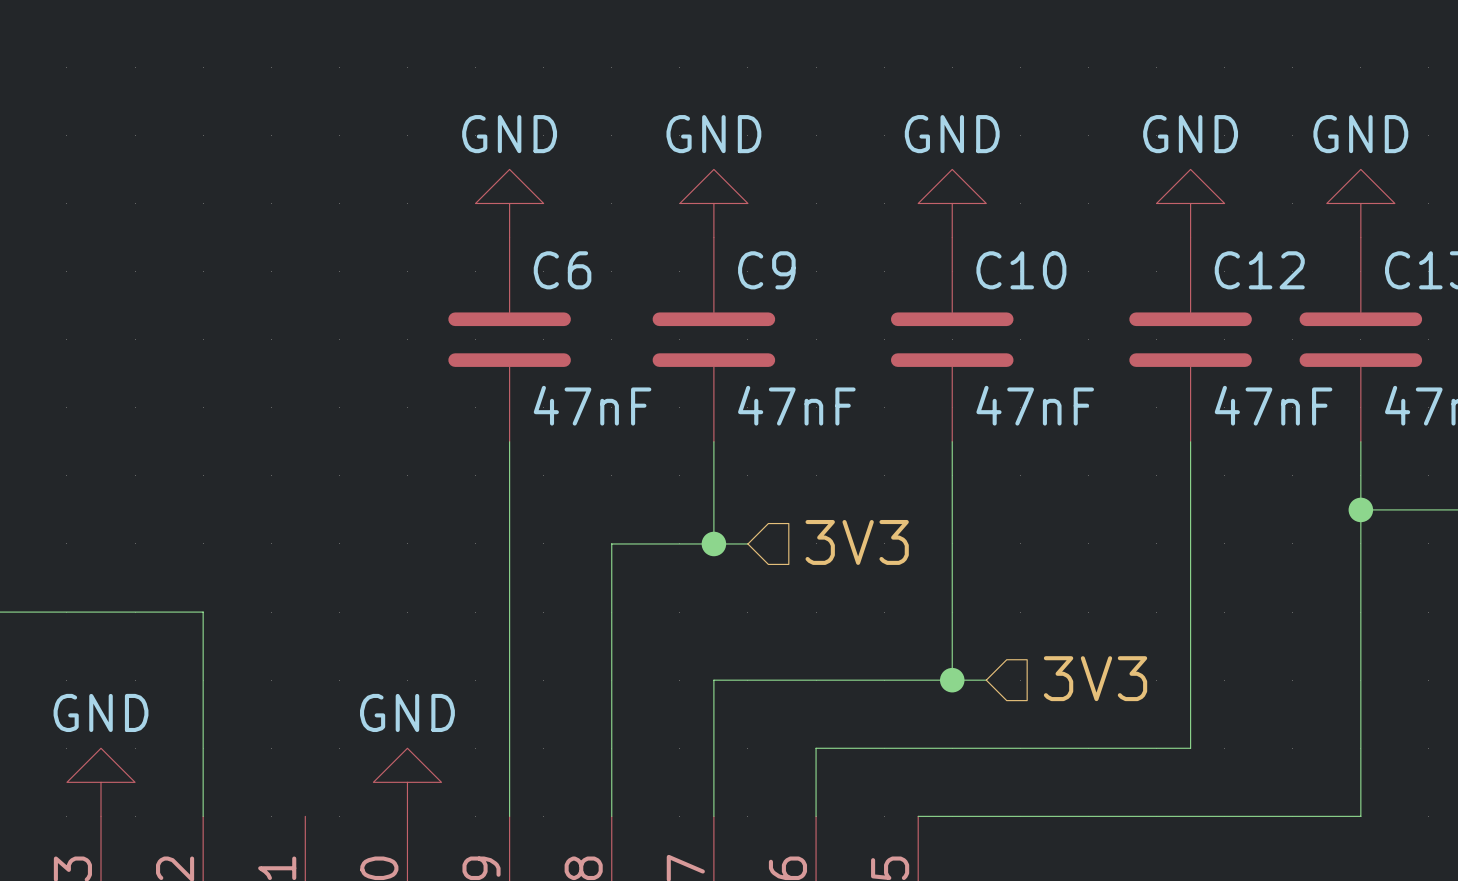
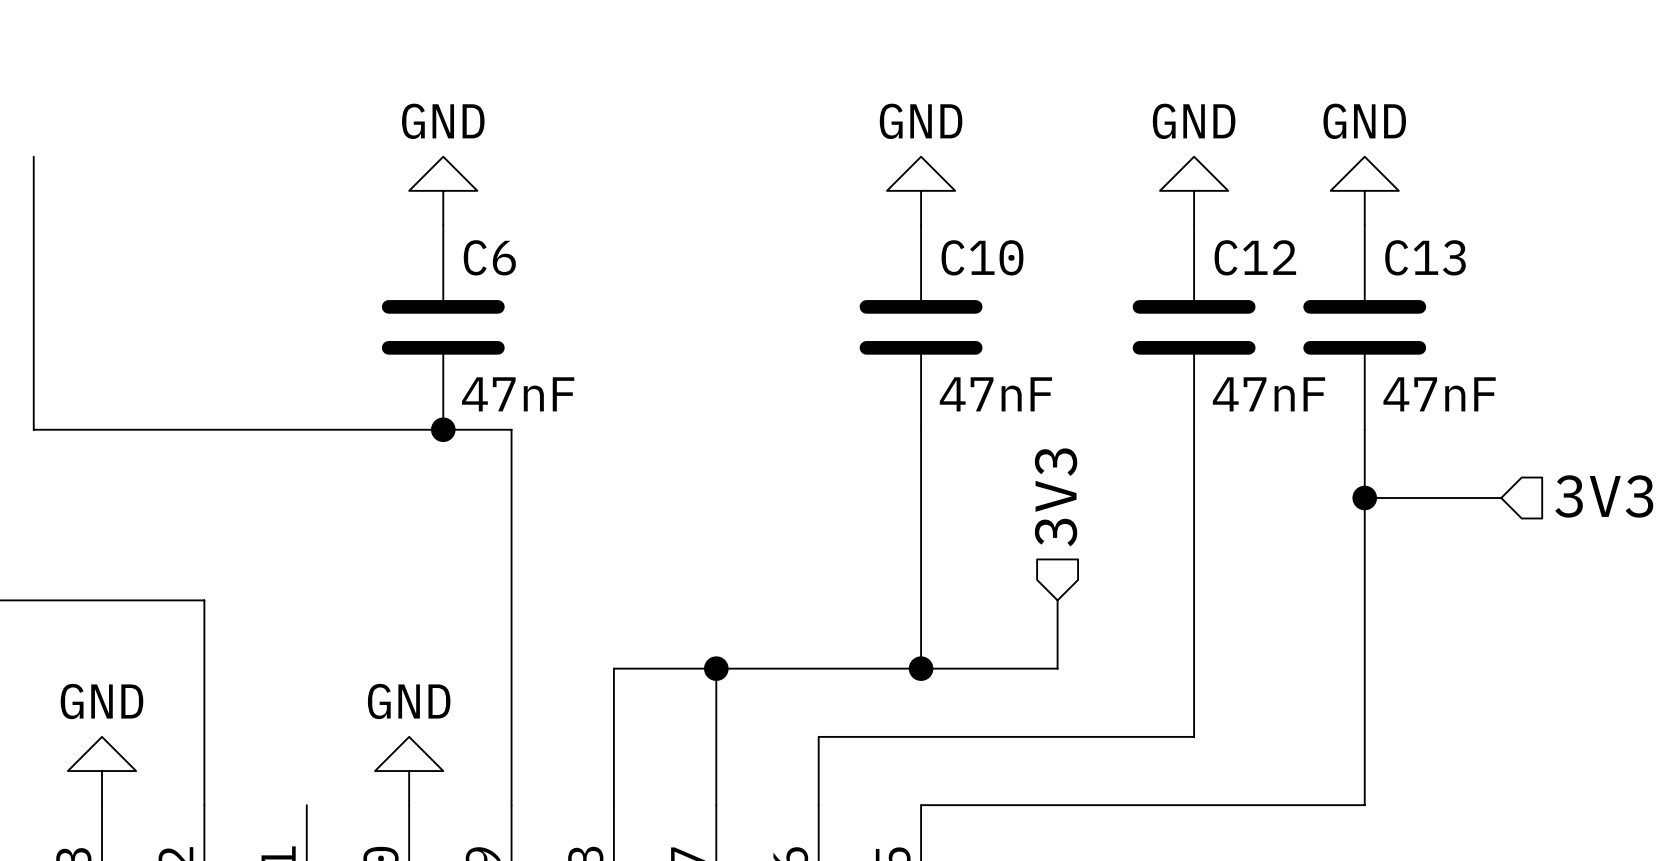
wire: none -> (33, 156) (33, 429) (511, 429)
power symbol position: GND (509, 203) -> GND (443, 190)
power symbol: GND (713, 203) -> none
power symbol position: GND (952, 203) -> GND (921, 190)
C6 position: (509, 339) -> (443, 327)
C9: 47nF (713, 339) -> none
C10 position: (952, 339) -> (921, 327)
junction: none -> (443, 429)
wire: (713, 441) (713, 543) -> none
wire: (952, 441) (952, 680) -> (921, 429) (921, 668)
hierarchical label: 3V3 (857, 542) -> none
junction: (713, 543) -> none
wire: (747, 543) (611, 543) (611, 680) -> (716, 668) (613, 668)
wire: none -> (1057, 600) (1057, 668) (989, 668)
hierarchical label rotation: 0° (1095, 678) -> 90° counterclockwise (1056, 497)
hierarchical label position: 3V3 (1095, 678) -> 3V3 (1056, 497)
junction: none -> (716, 668)
junction position: (952, 680) -> (921, 668)

